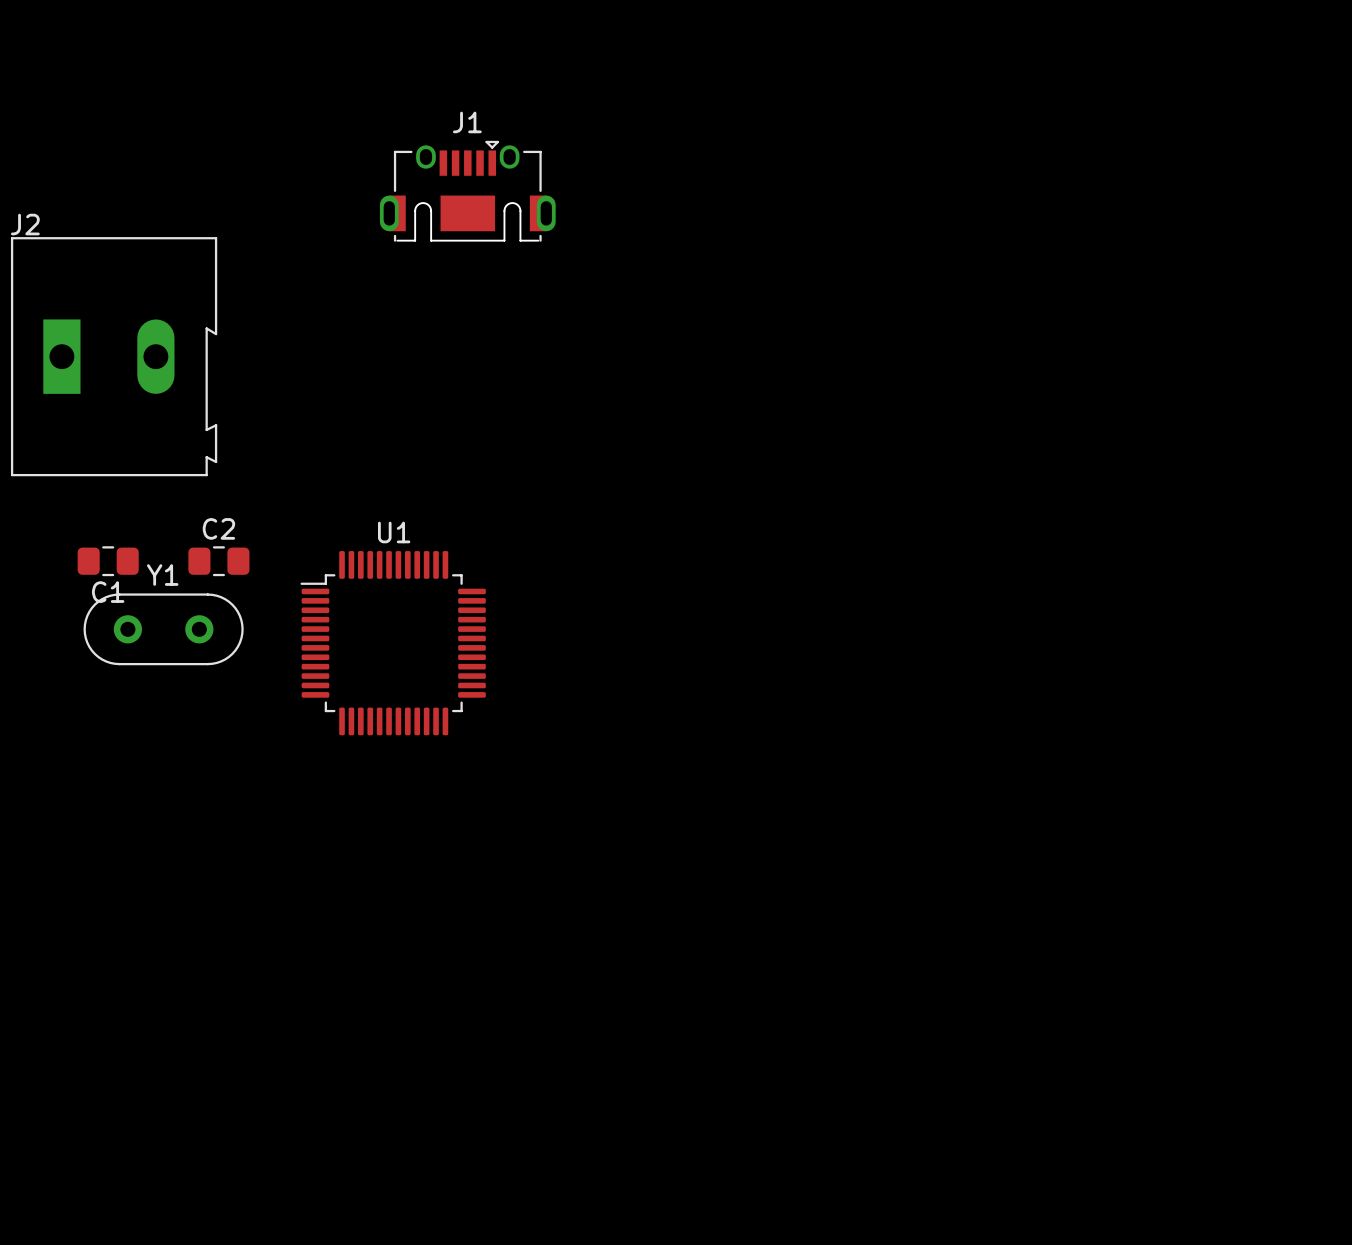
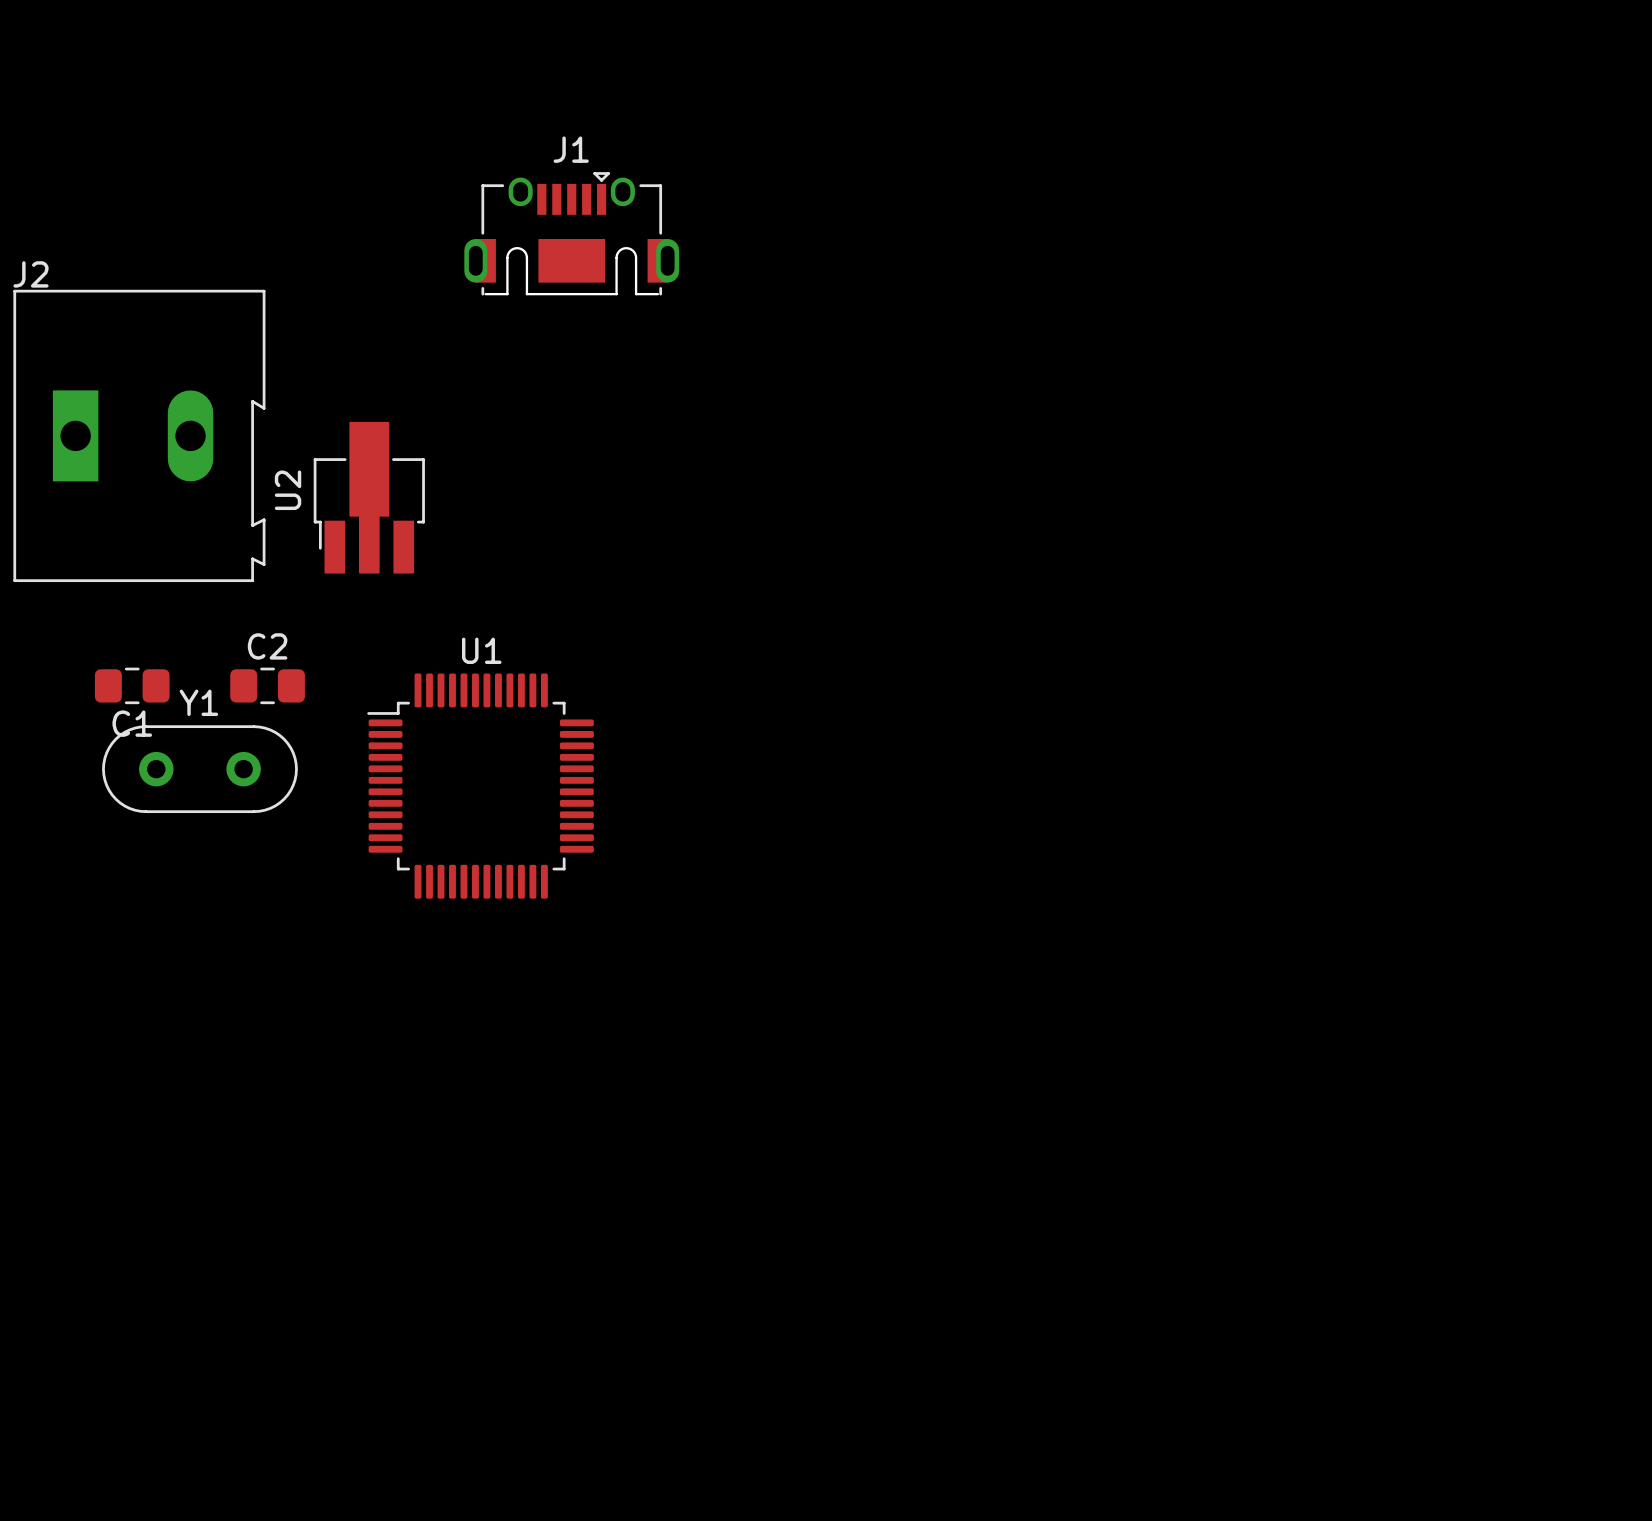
U2: none -> (369, 497)

